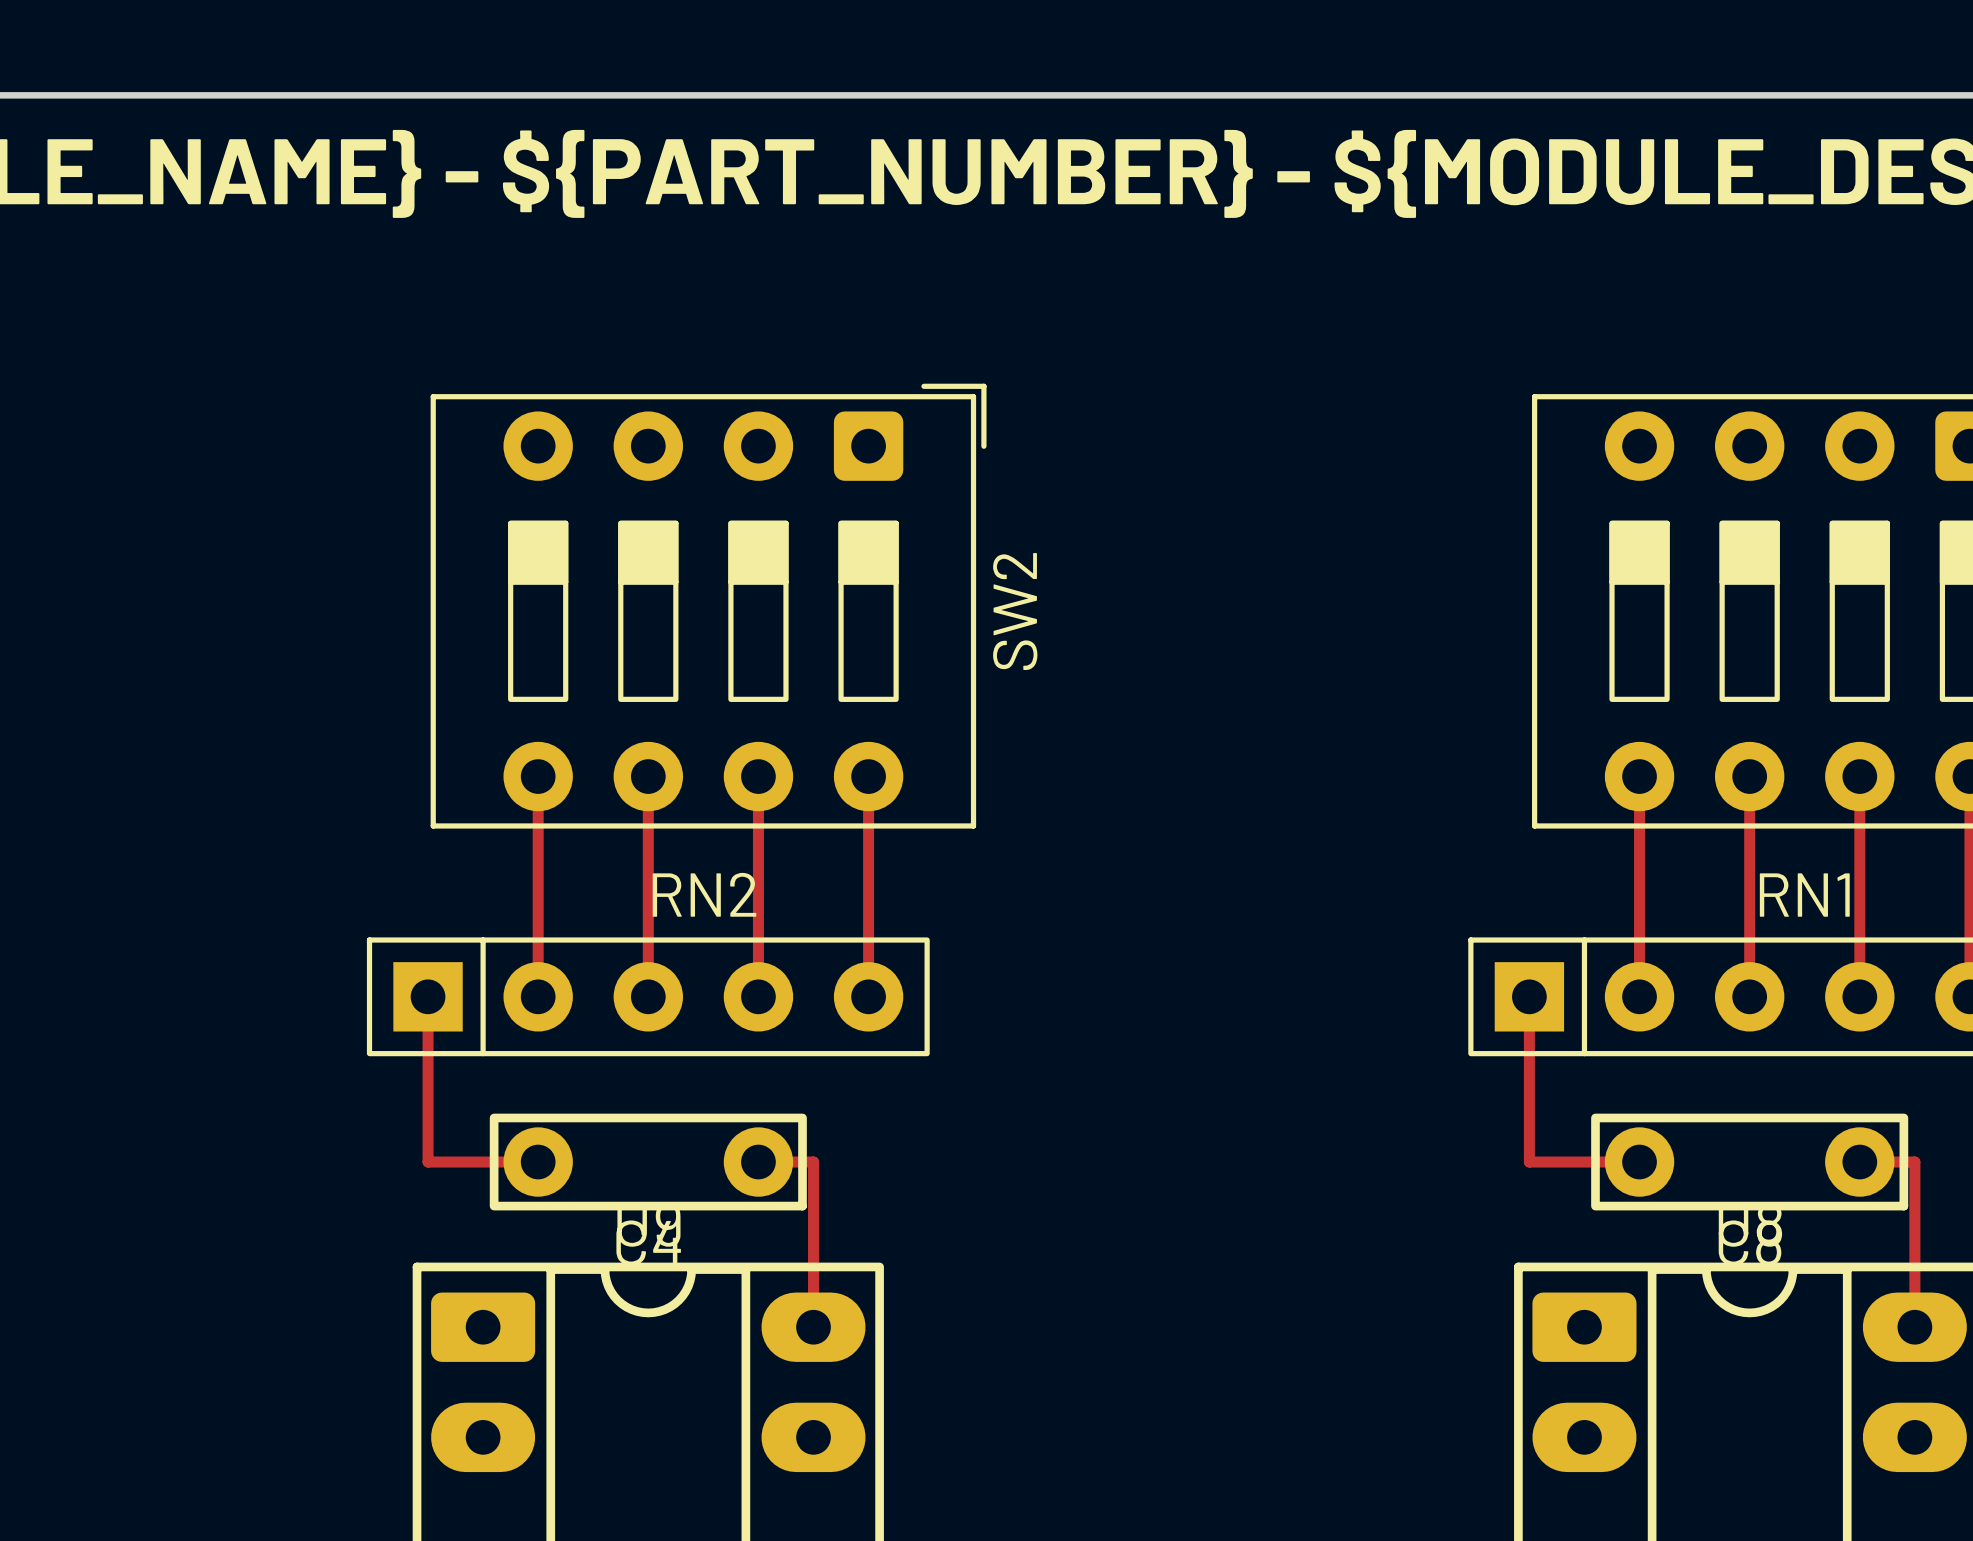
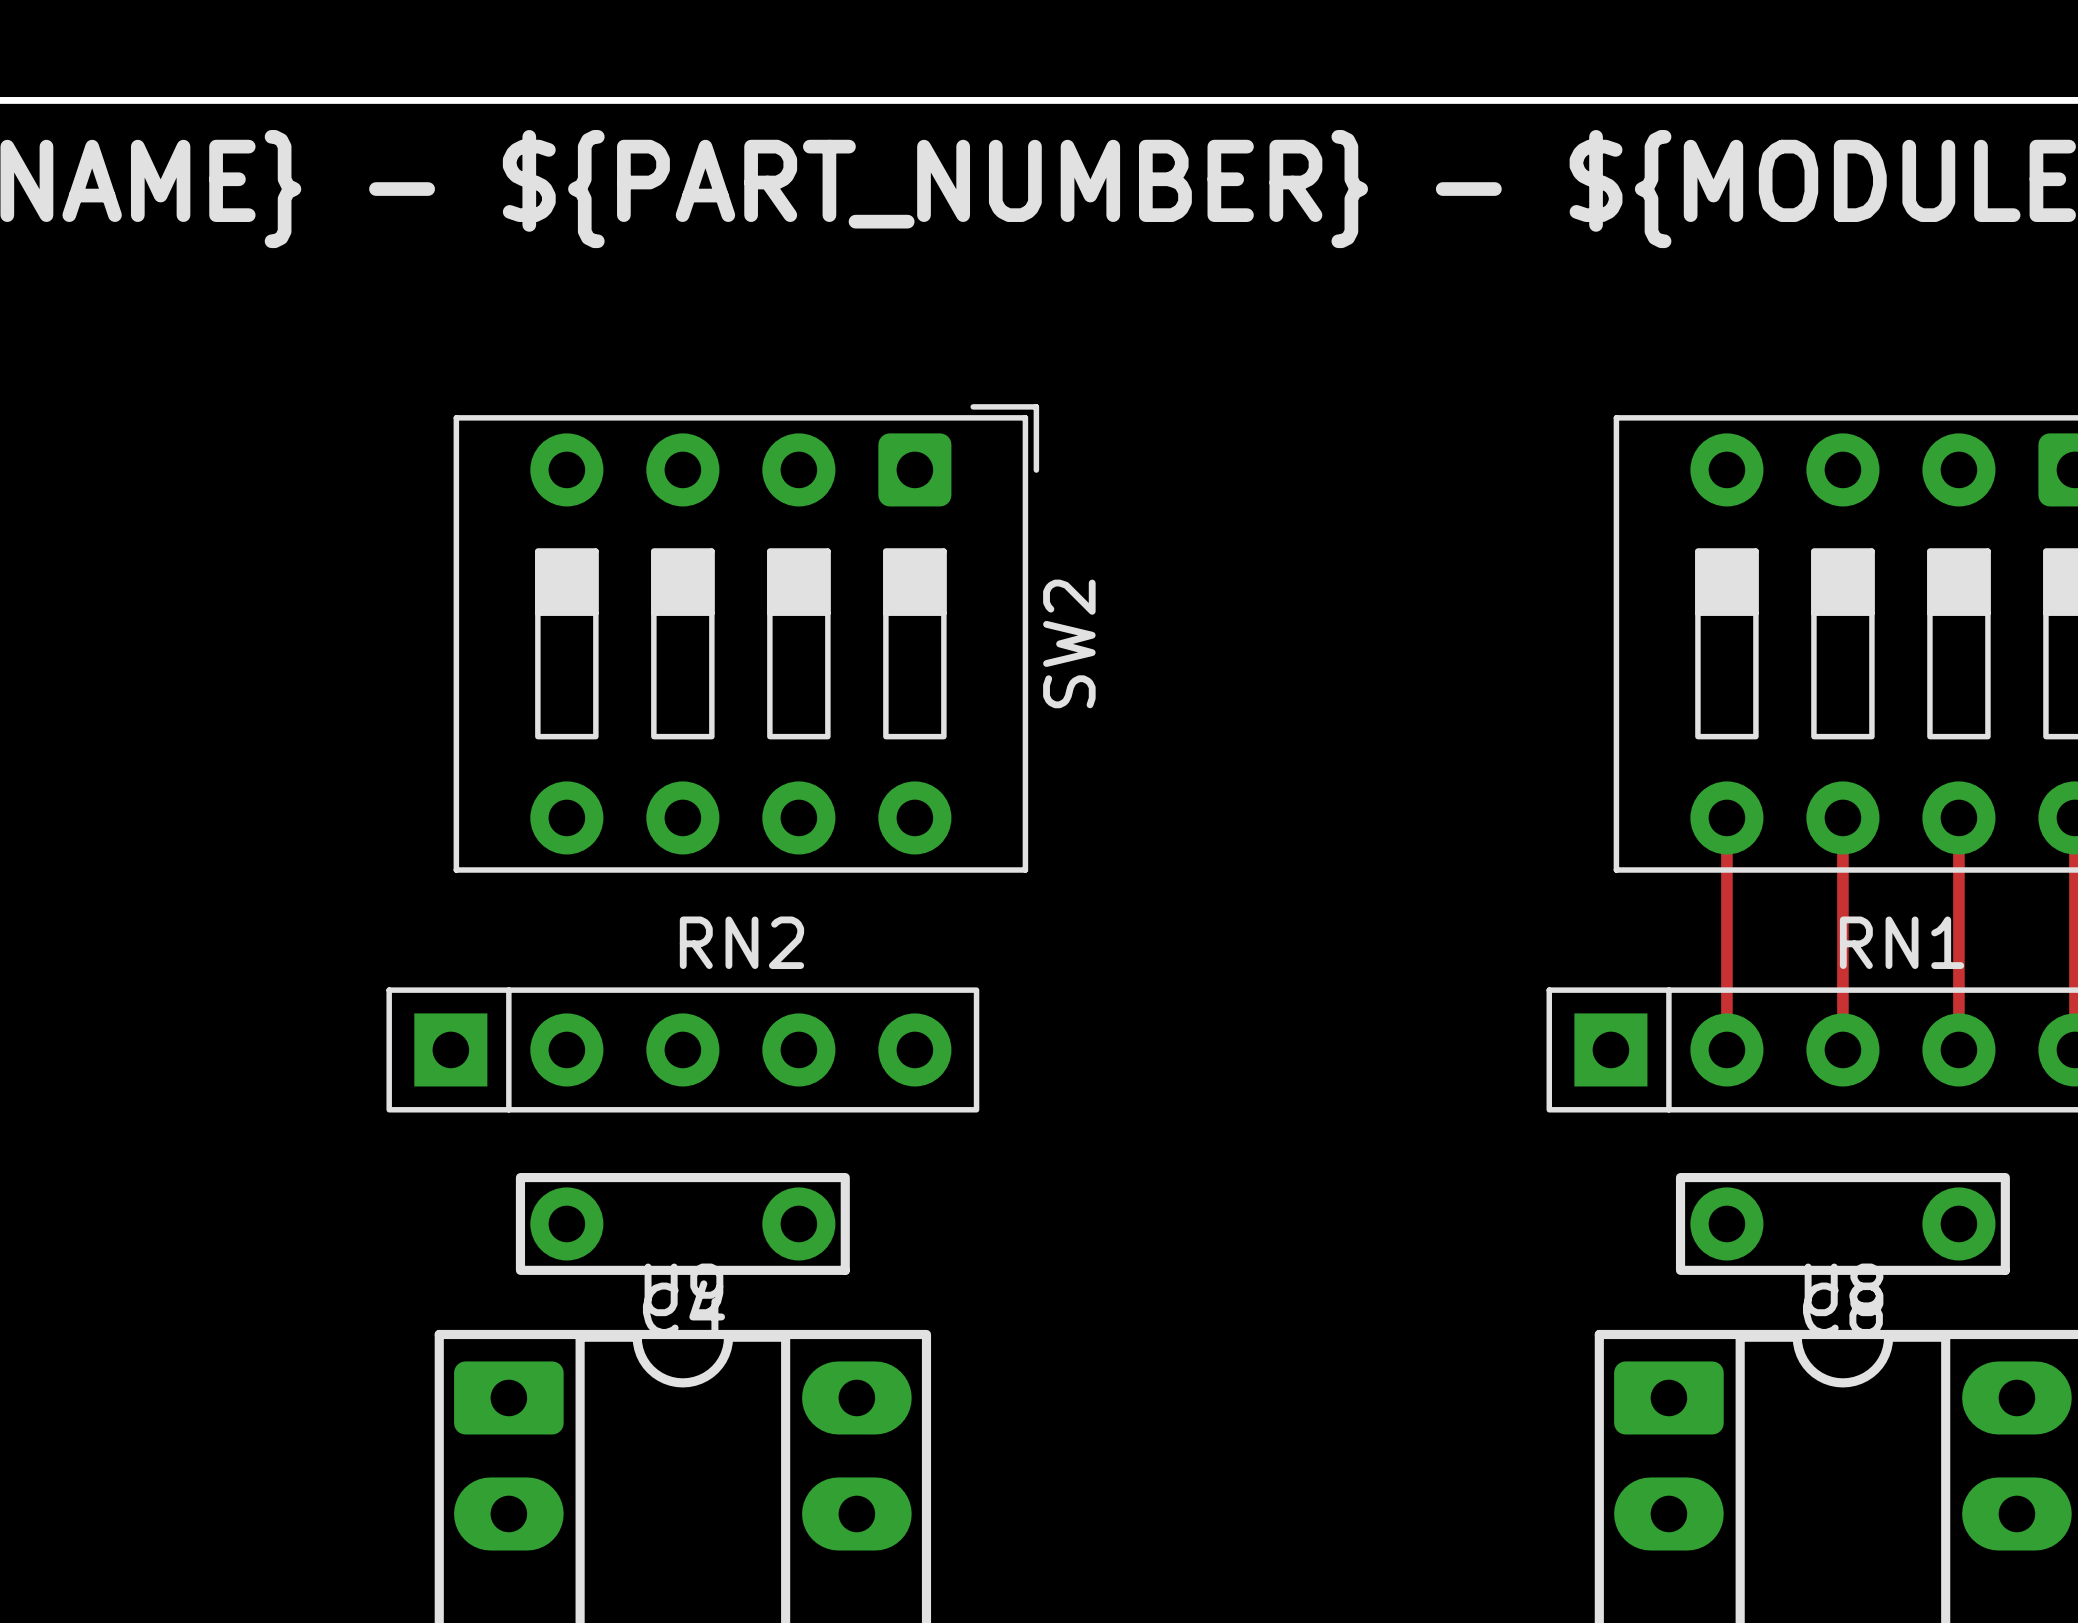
track: (538, 776) (538, 996) -> none
track: (648, 776) (648, 996) -> none
track: (758, 776) (758, 996) -> none
track: (868, 776) (868, 996) -> none
track: (428, 996) (428, 1162) (538, 1162) -> none
track: (1529, 996) (1529, 1162) (1639, 1162) -> none
track: (758, 1162) (813, 1162) (813, 1327) -> none
track: (1859, 1162) (1914, 1162) (1914, 1327) -> none

